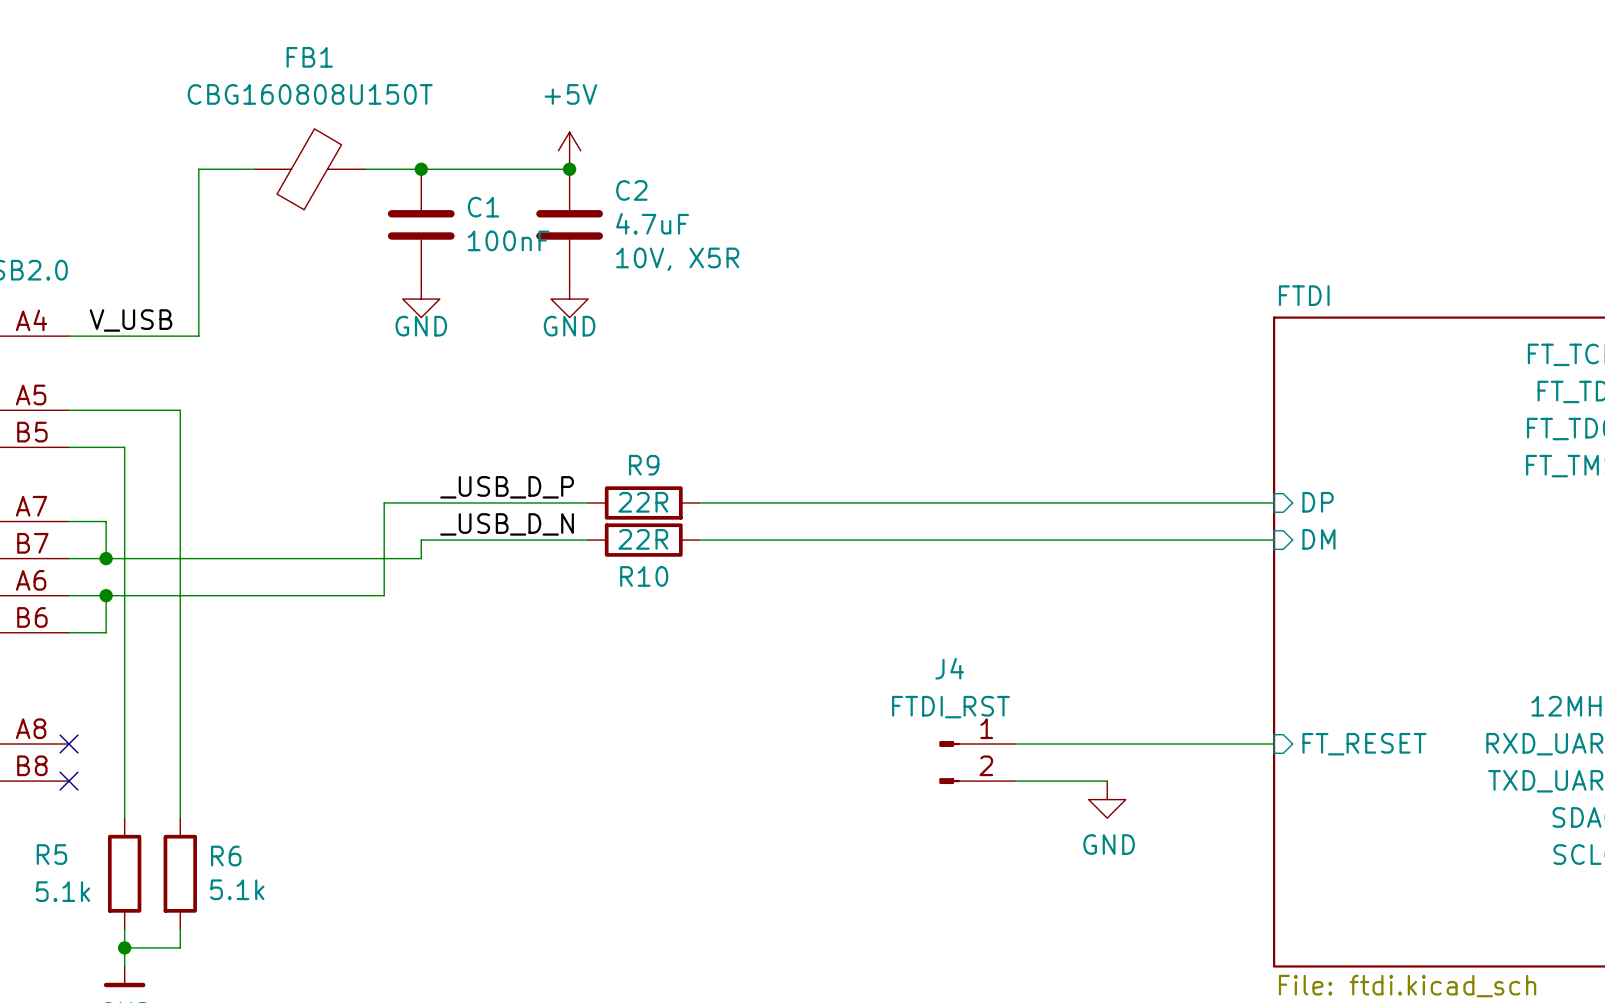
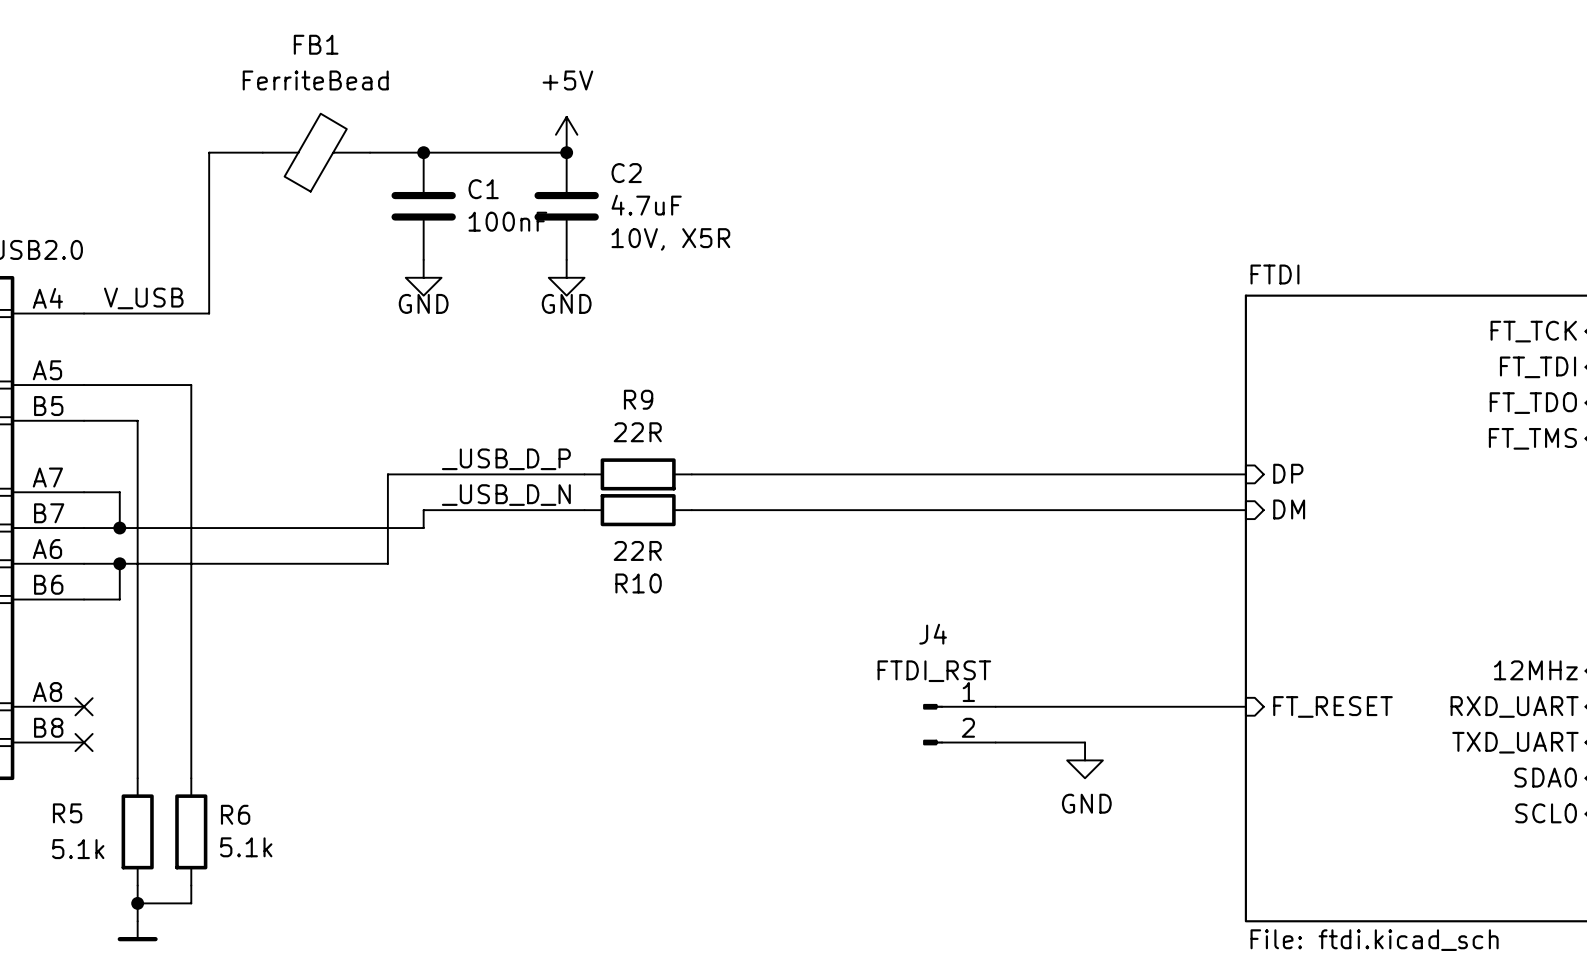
FB1 value: CBG160808U150T (310, 94) -> FerriteBead (315, 80)
R9 name position: R9 (644, 465) -> R9 (638, 399)
R9 value position: 22R (643, 502) -> 22R (637, 432)
R10 value position: 22R (643, 539) -> 22R (637, 550)
R10 name position: R10 (644, 576) -> R10 (638, 583)

